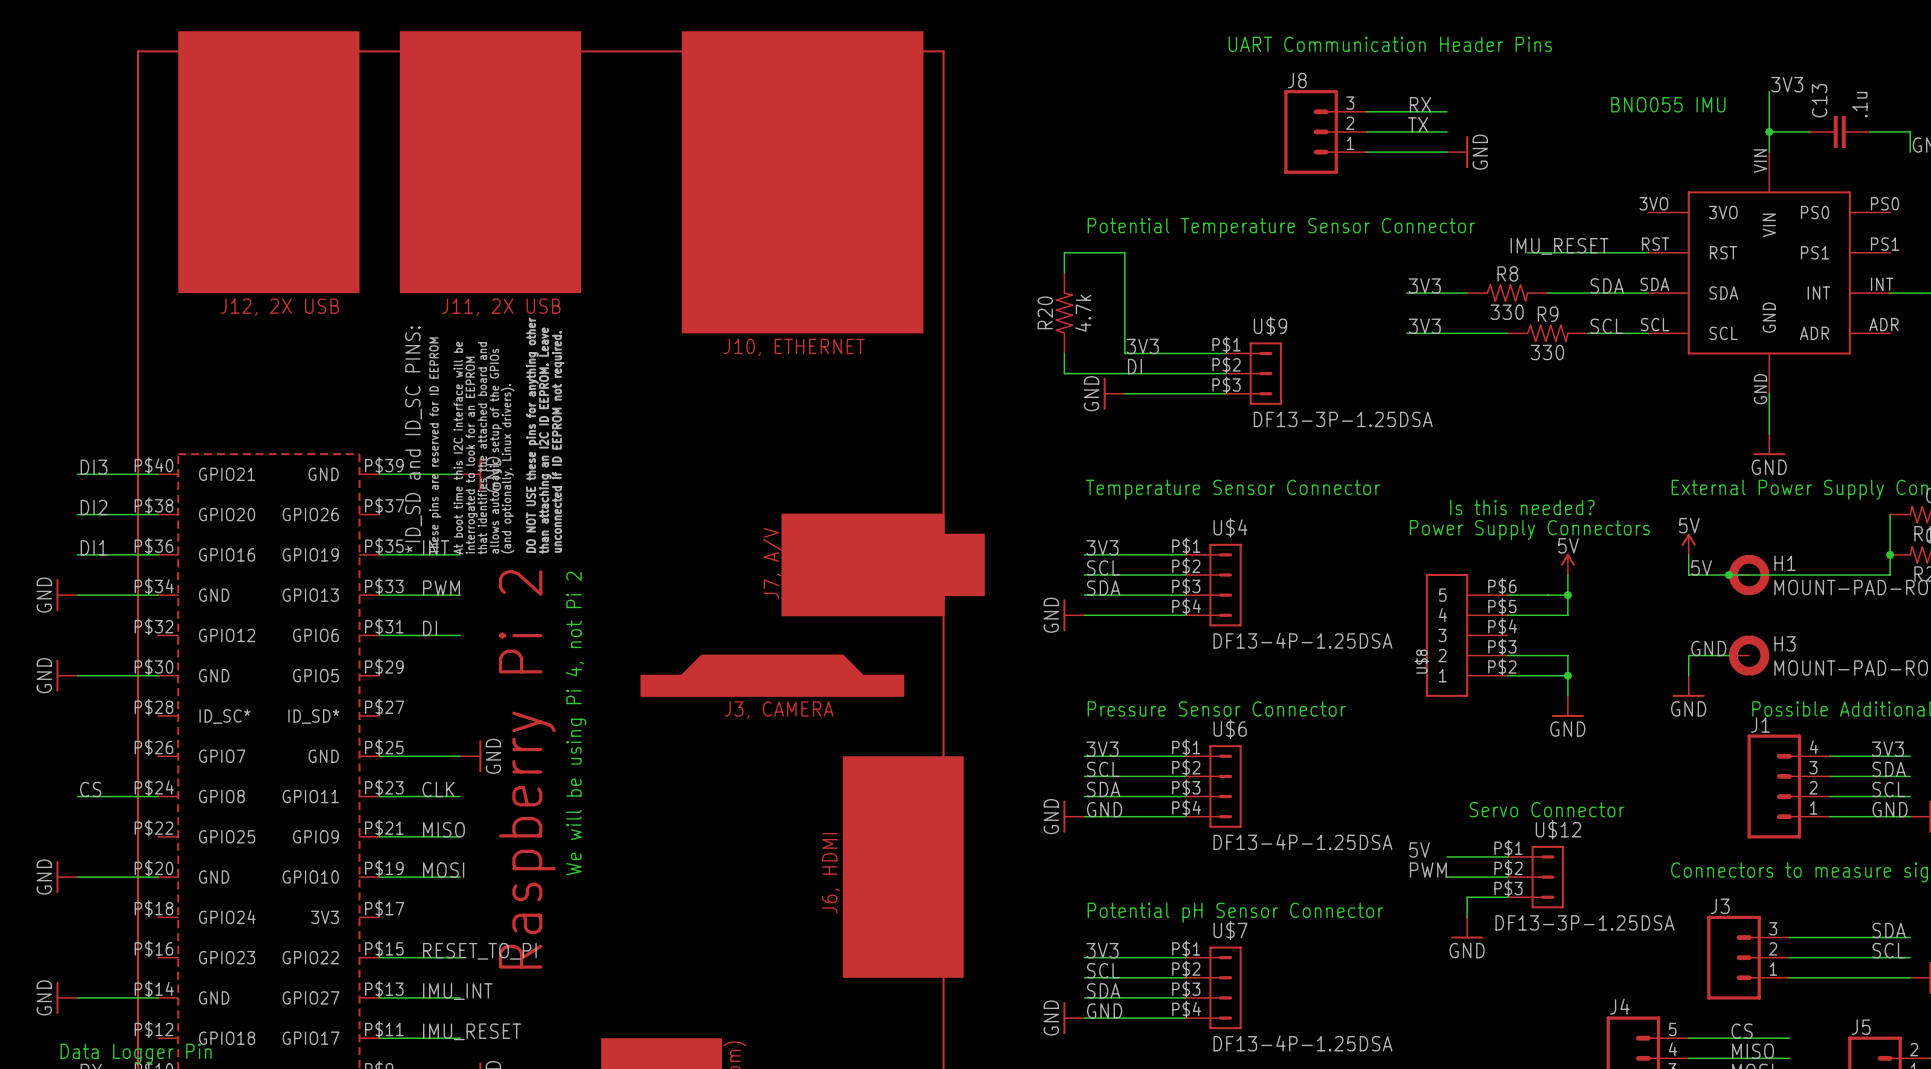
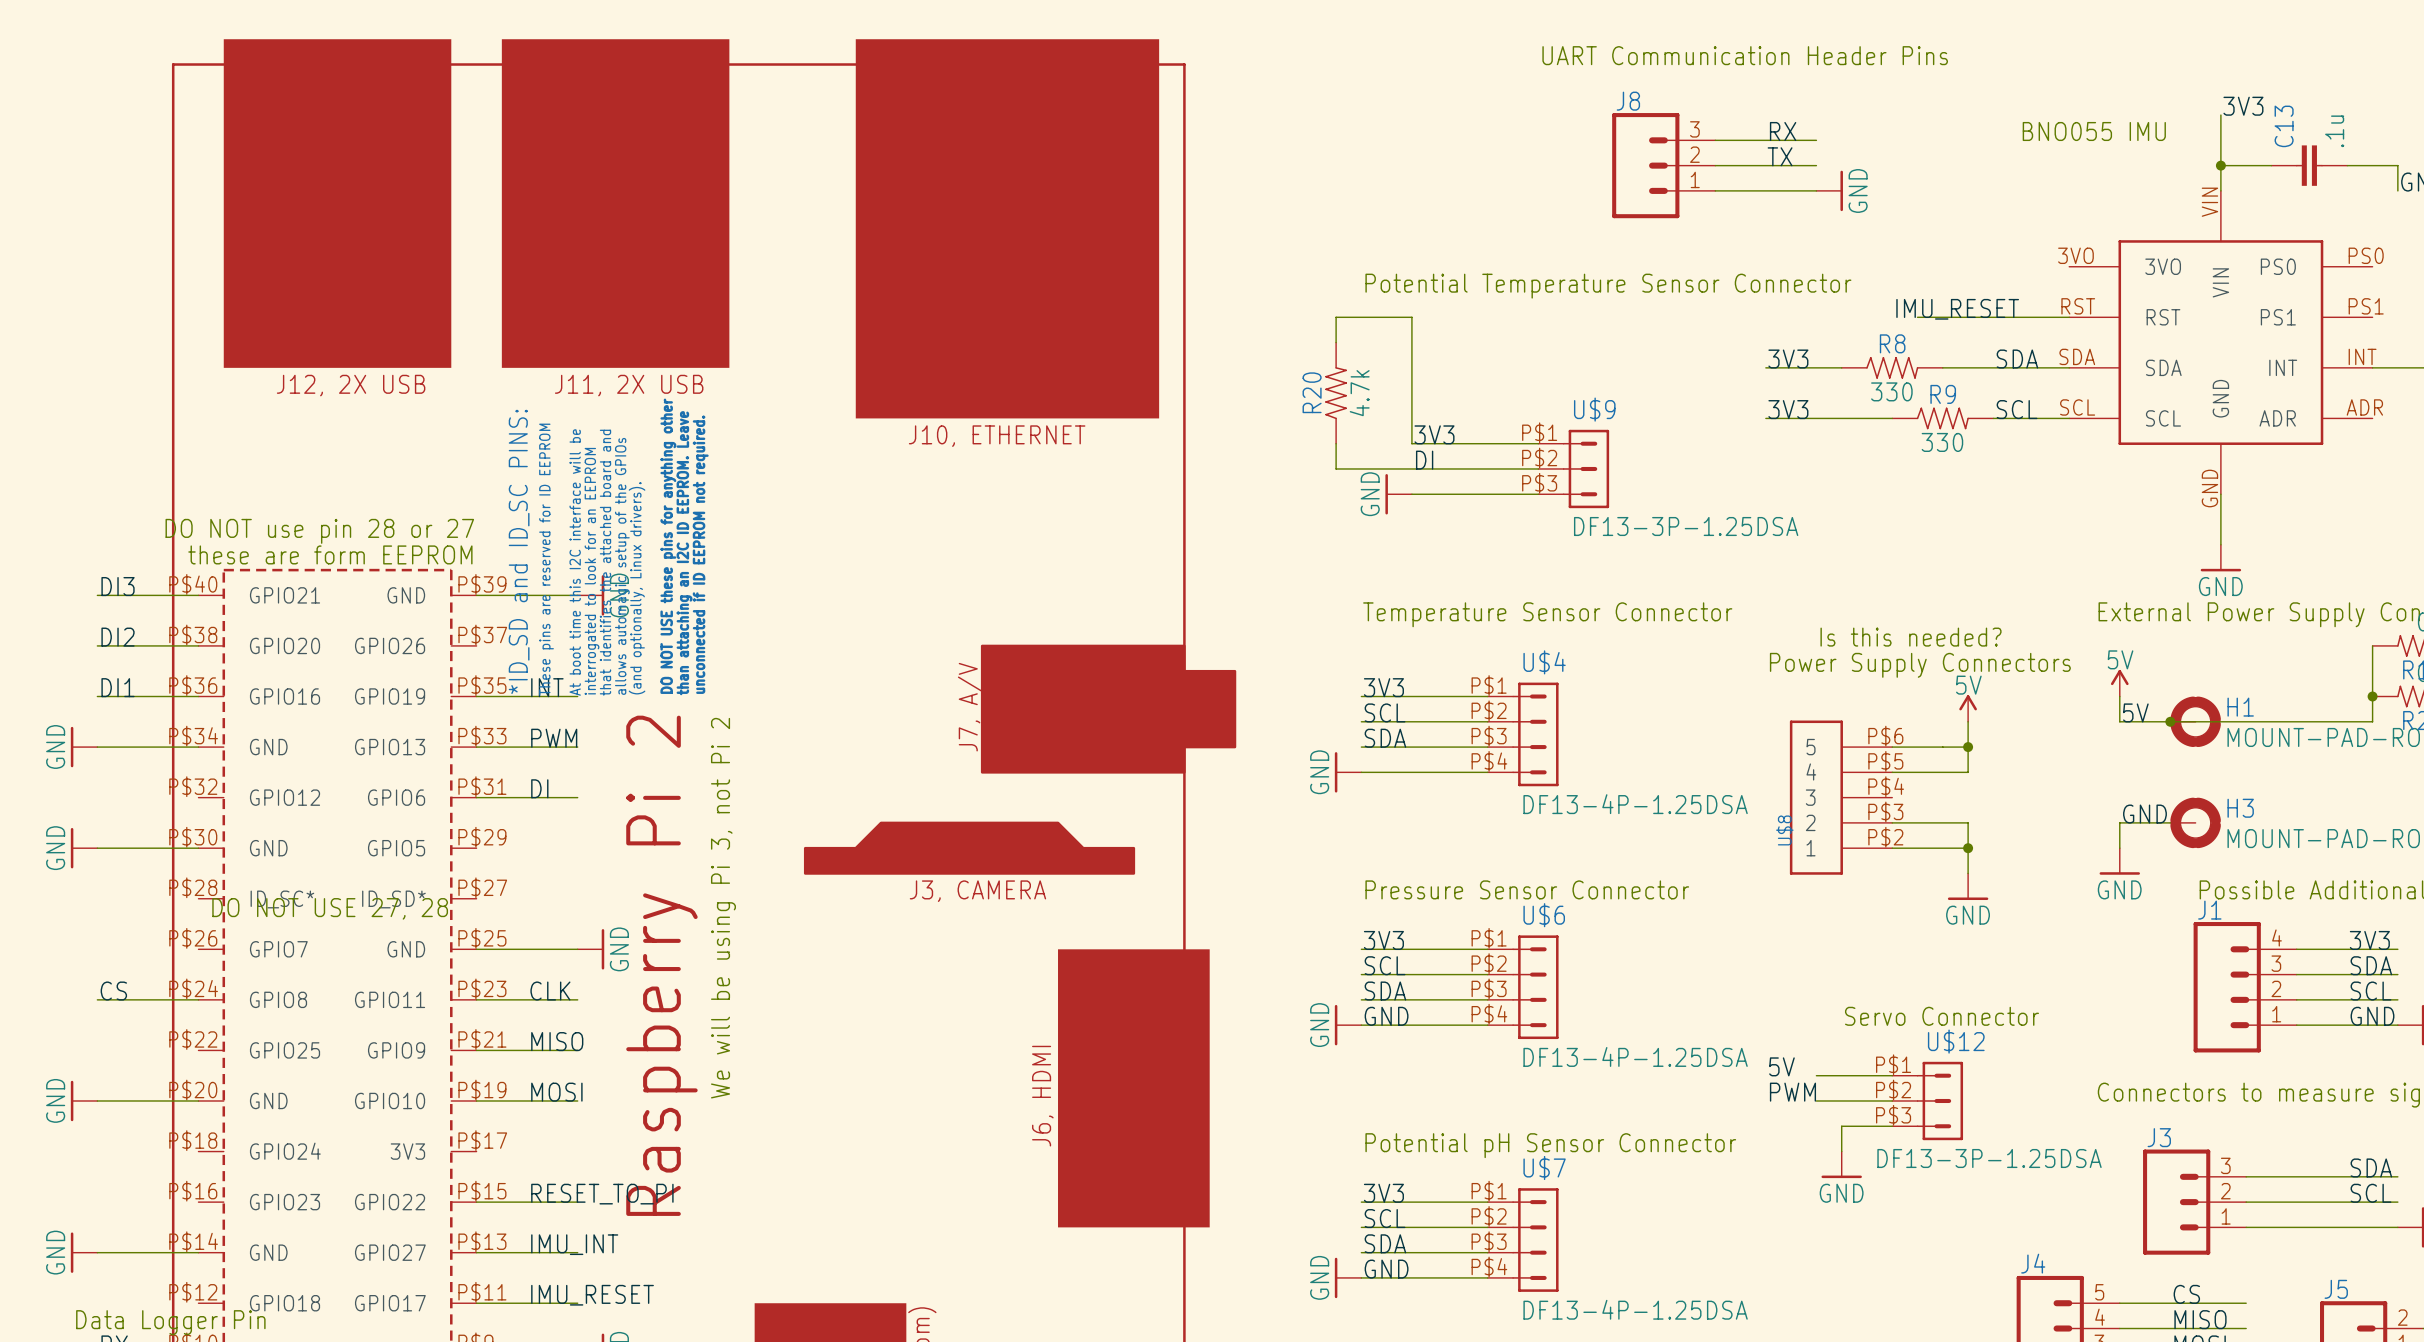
text: none -> DO NOT use pin 28 or 27 (319, 531)
text: none -> these are form EEPROM (330, 554)
text: We will be using Pi 4, not Pi 2 (576, 723) -> We will be using Pi 3, not Pi 2 (723, 908)
text: none -> DO NOT USE 27, 28 (330, 908)

